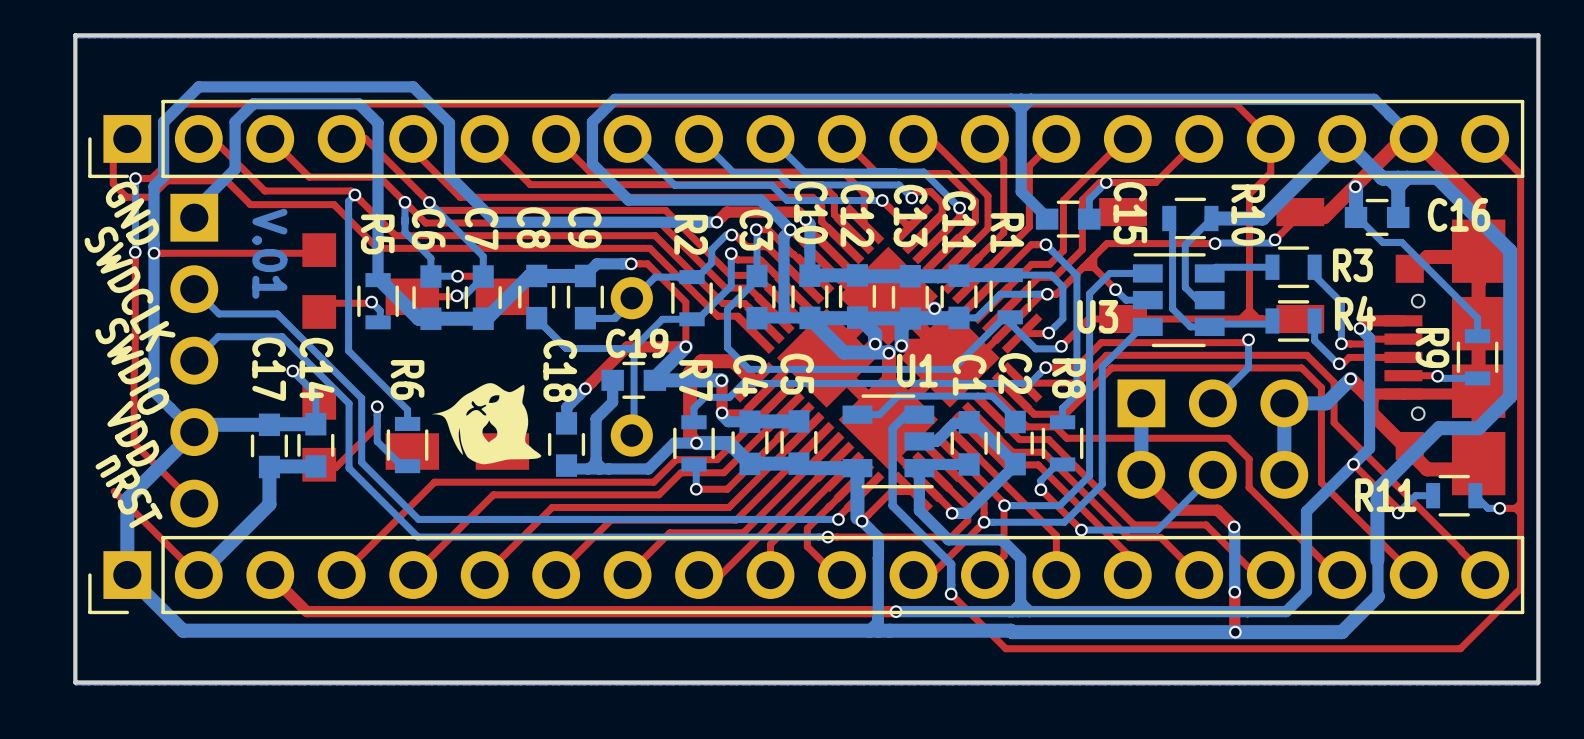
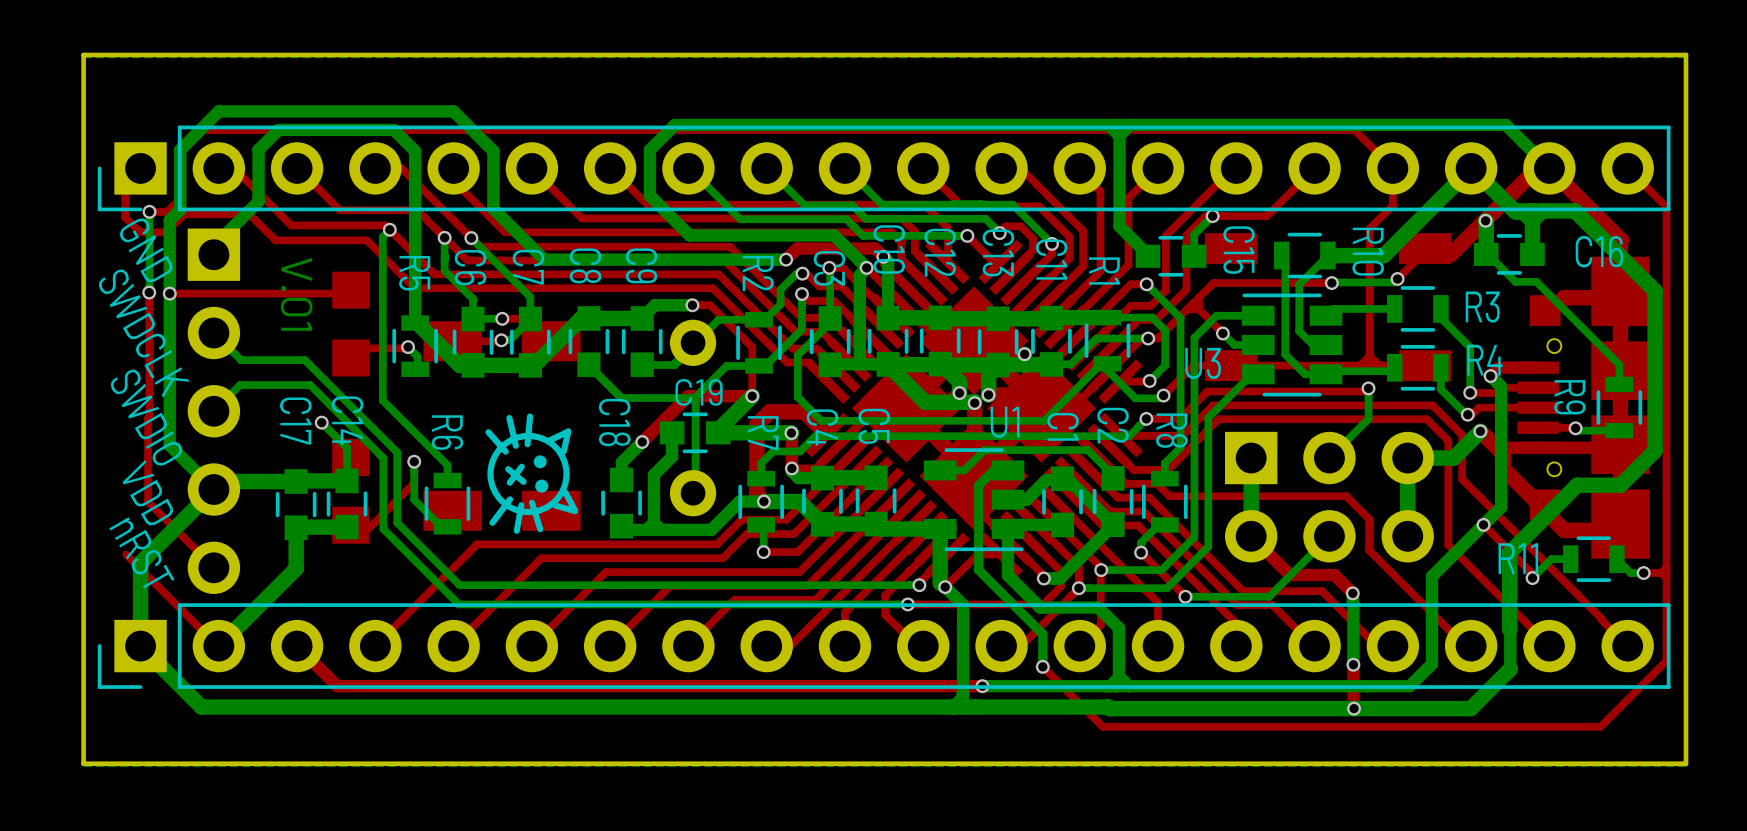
line: none -> (530, 416) (527, 444)
line: none -> (509, 418) (515, 445)
line: none -> (568, 431) (563, 451)
line: none -> (488, 432) (505, 451)
line: none -> (567, 431) (549, 440)
drawing: none -> [487, 432, 570, 516]
drawing: [432, 383, 542, 465] -> none
line: none -> (521, 466) (509, 482)
line: none -> (508, 469) (523, 481)
line: none -> (565, 492) (575, 510)
line: none -> (510, 499) (492, 522)
line: none -> (531, 502) (540, 529)
line: none -> (521, 505) (516, 530)
line: none -> (555, 505) (575, 511)

